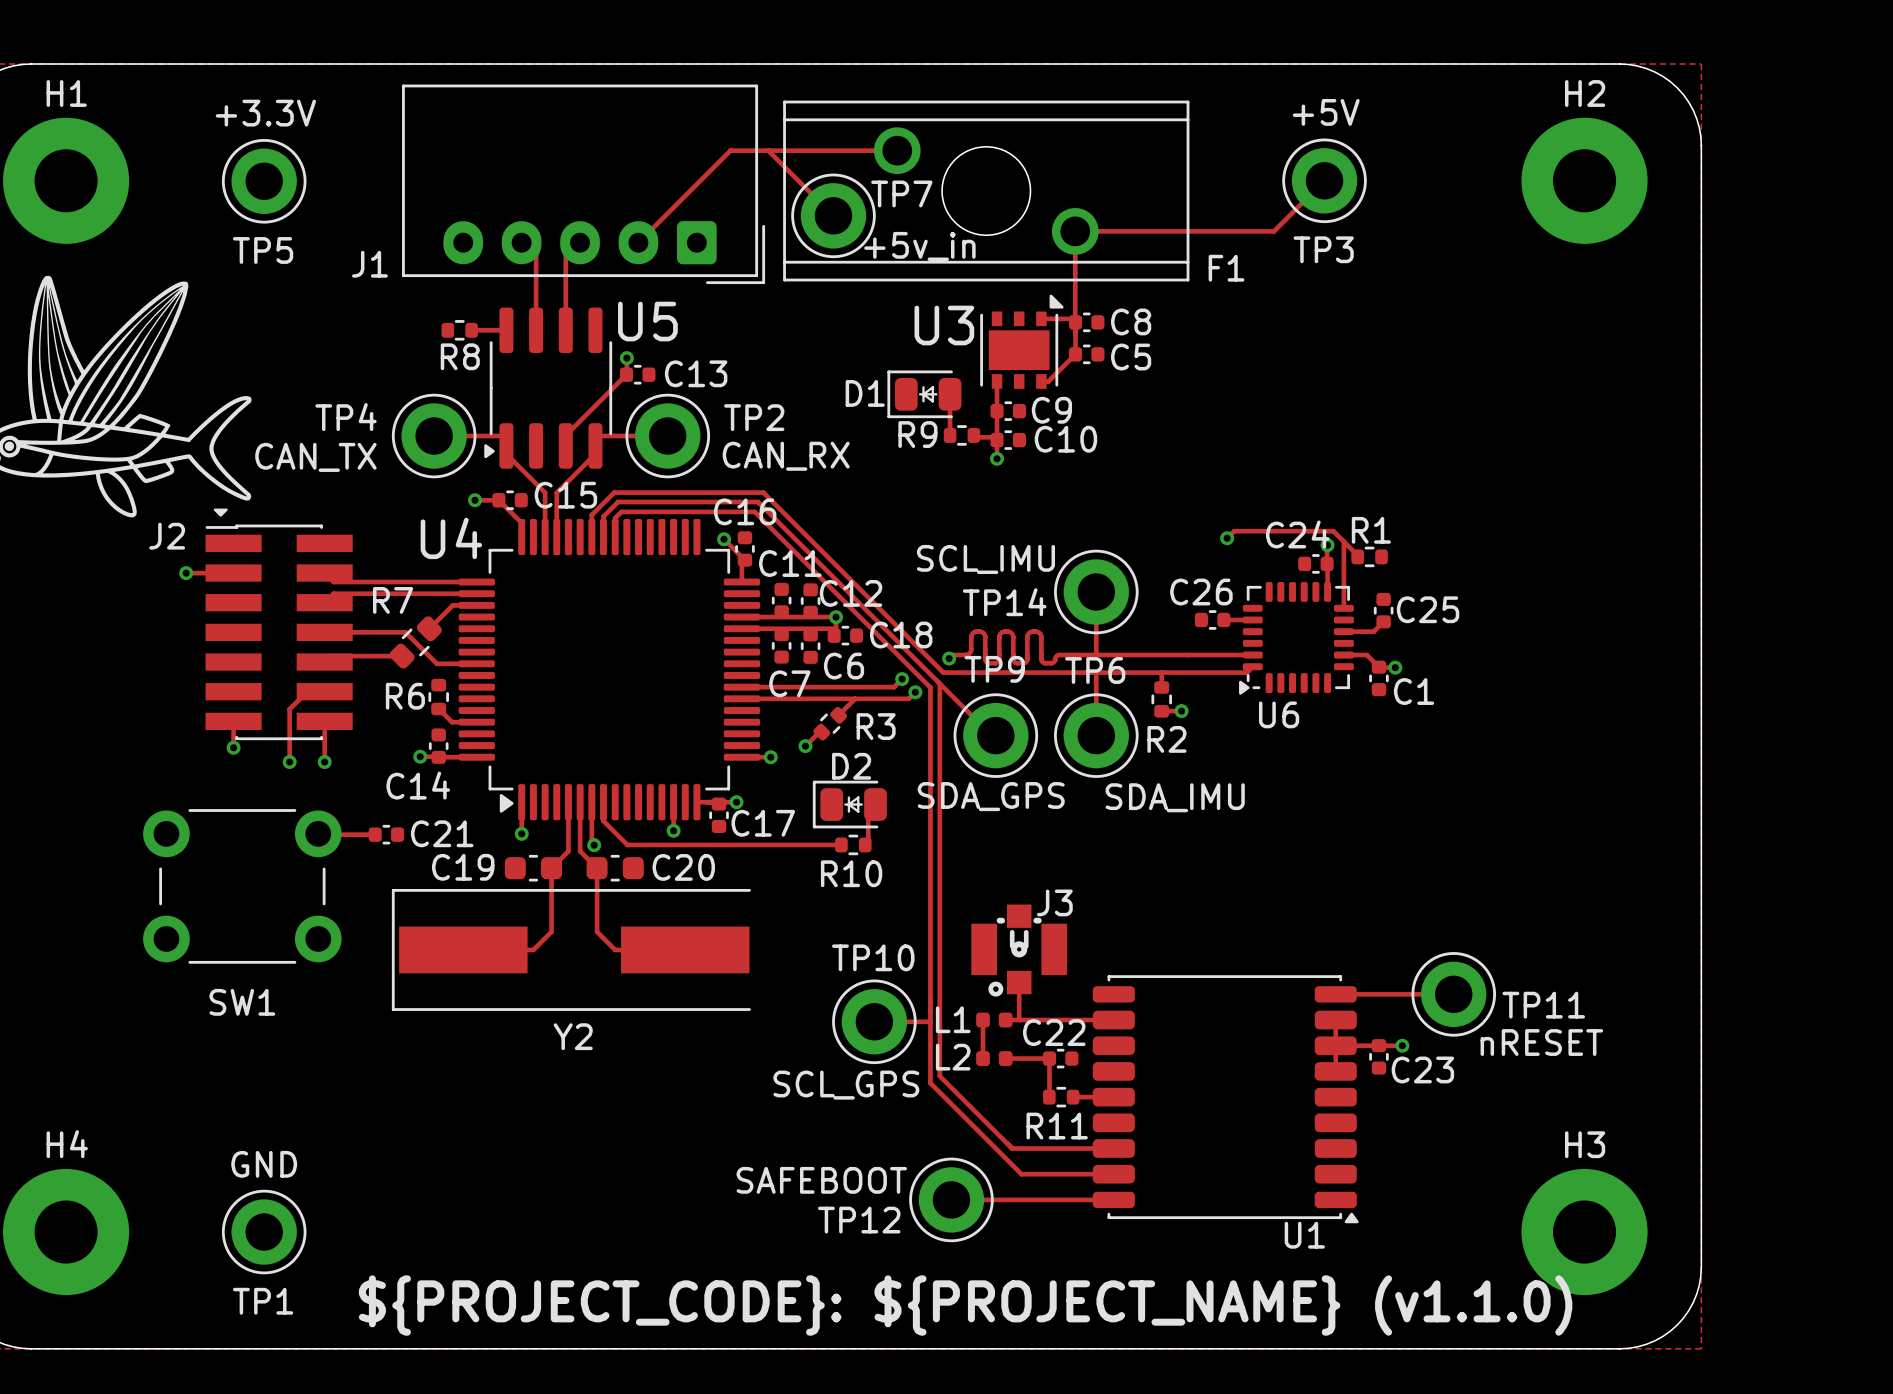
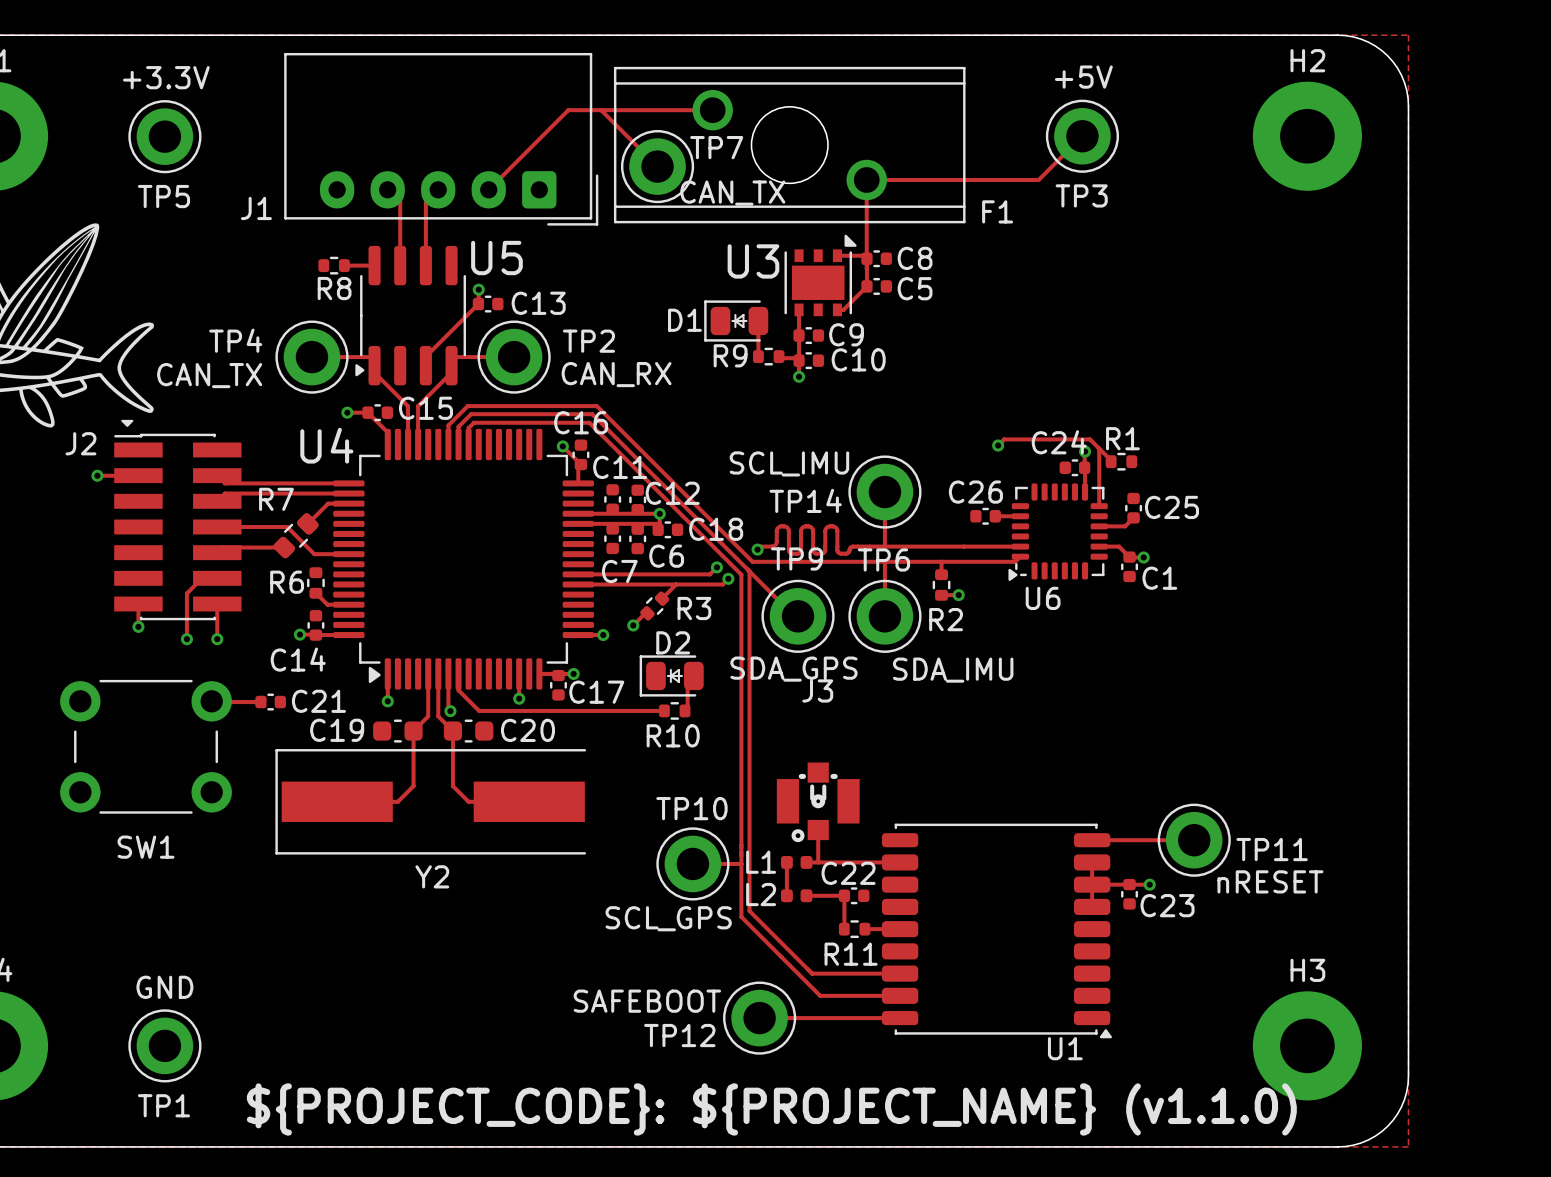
TP7 text: +5v_in (919, 246) -> CAN_TX (732, 193)
J3 name position: J3 (1054, 902) -> J3 (817, 690)

